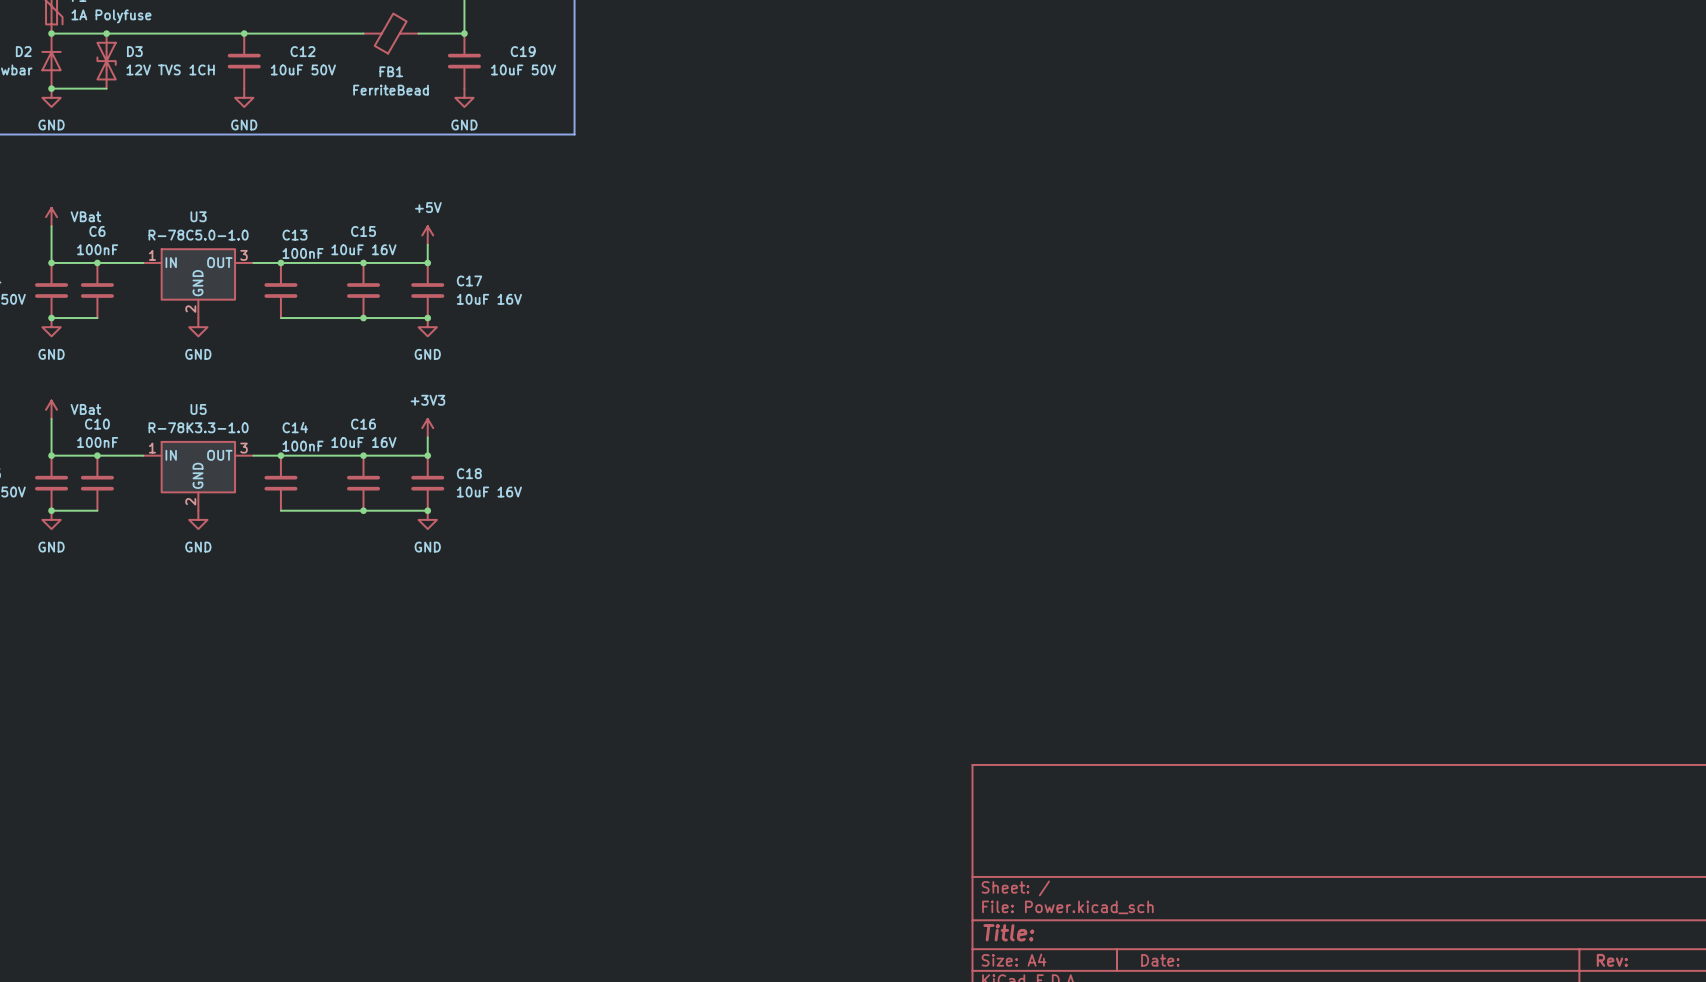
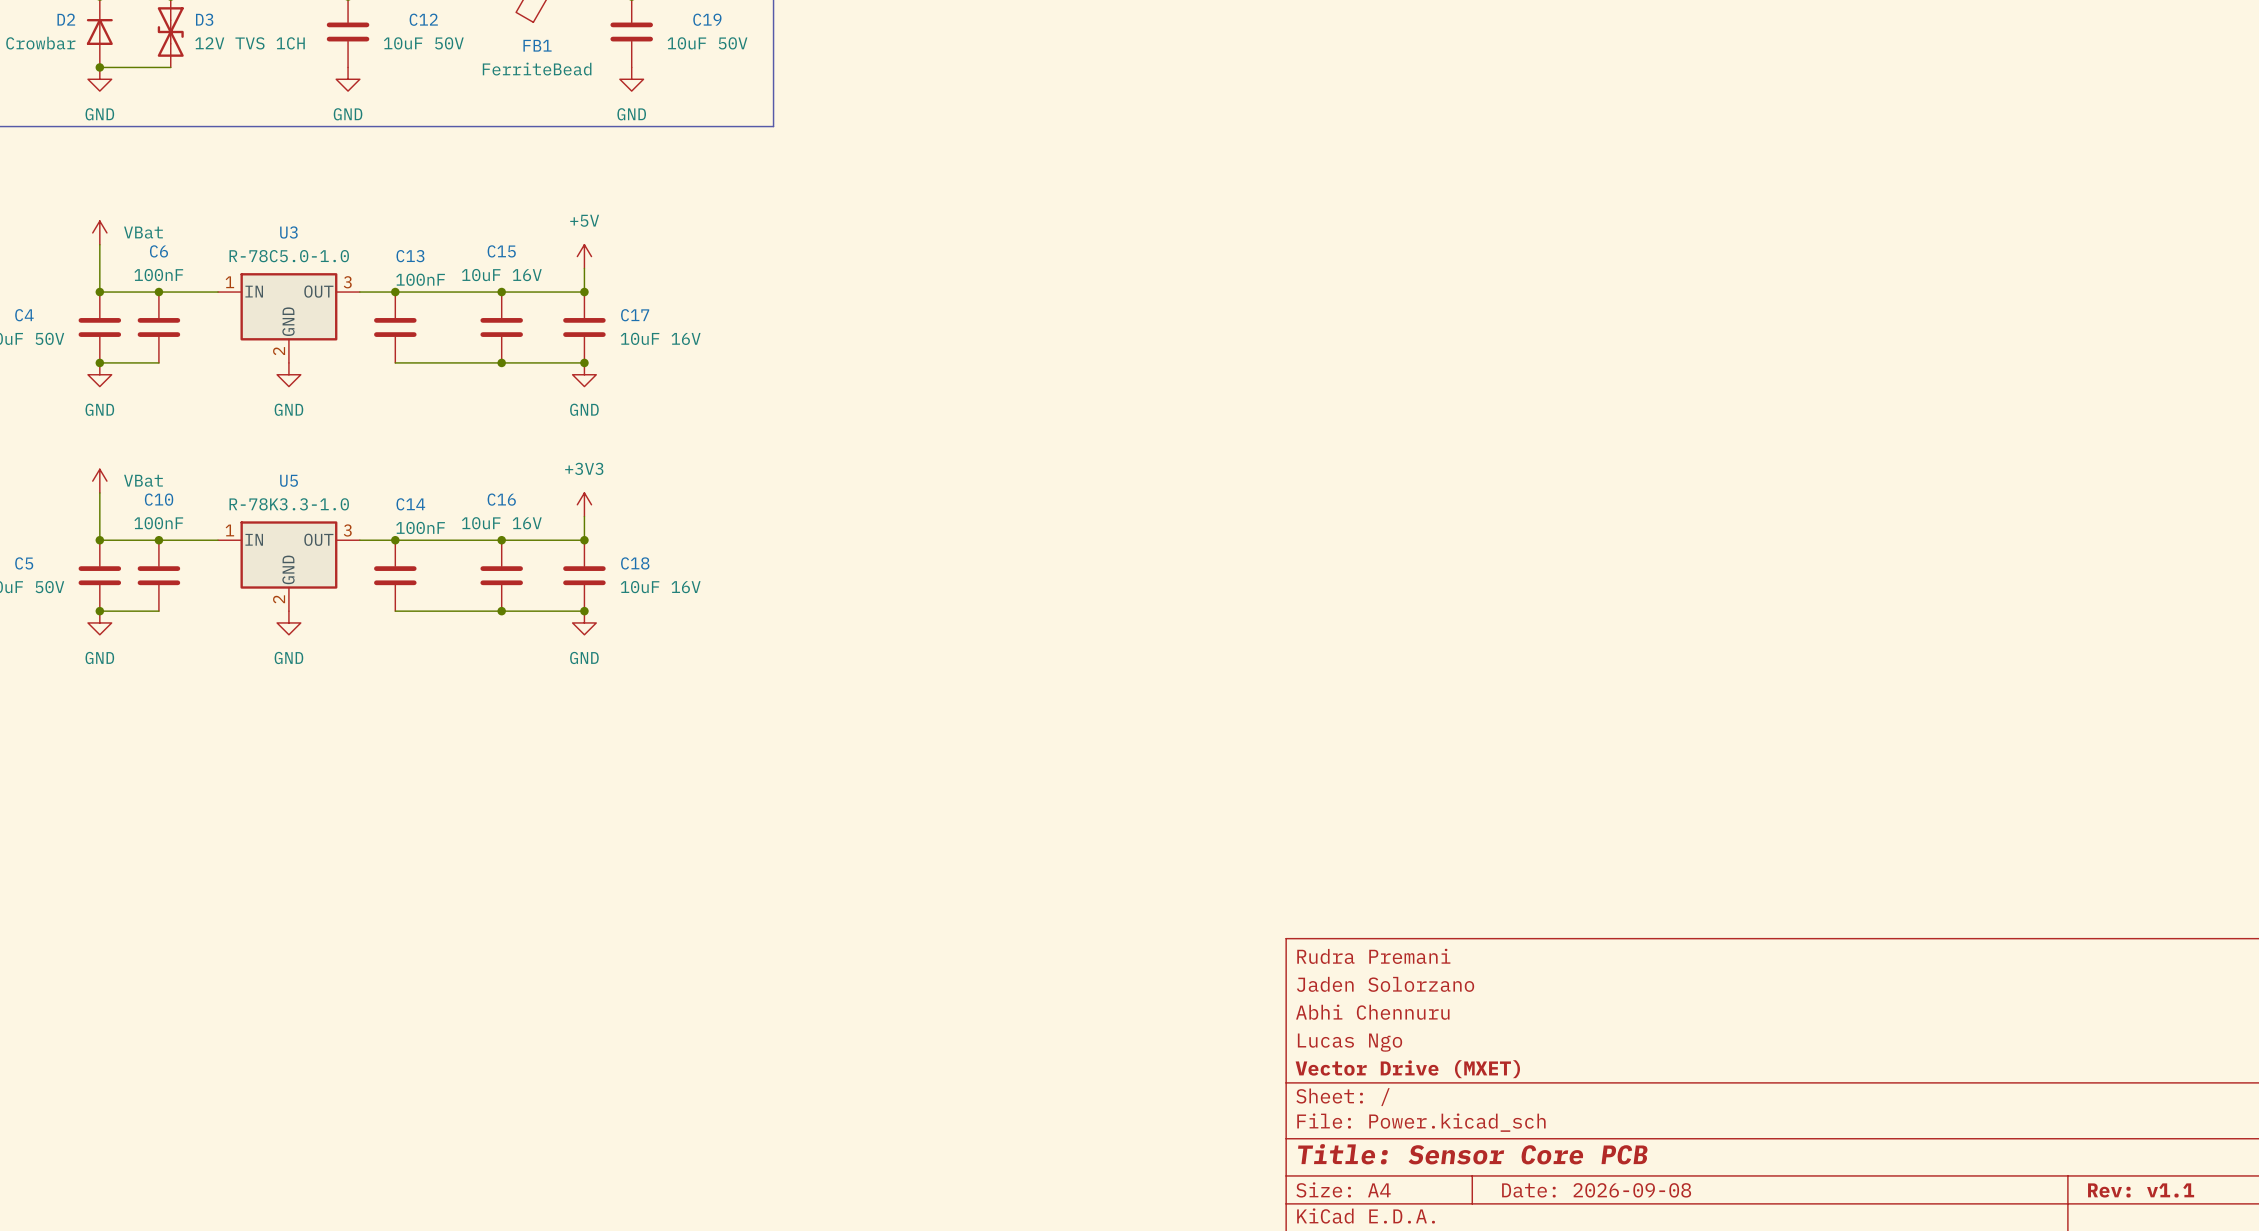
title block: none -> Rudra Premani (1373, 956)
title block: none -> Jaden Solorzano (1385, 984)
title block: none -> Abhi Chennuru (1372, 1012)
title block: none -> Lucas Ngo (1350, 1042)
title block: none -> Vector Drive (MXET) (1407, 1069)
title block: Title: (1008, 932) -> Title: Sensor Core PCB (1472, 1154)
title block: Date: (1160, 960) -> Date: 2026-09-08 (1596, 1190)
title block: Rev: (1612, 960) -> Rev: v1.1 (2141, 1190)

